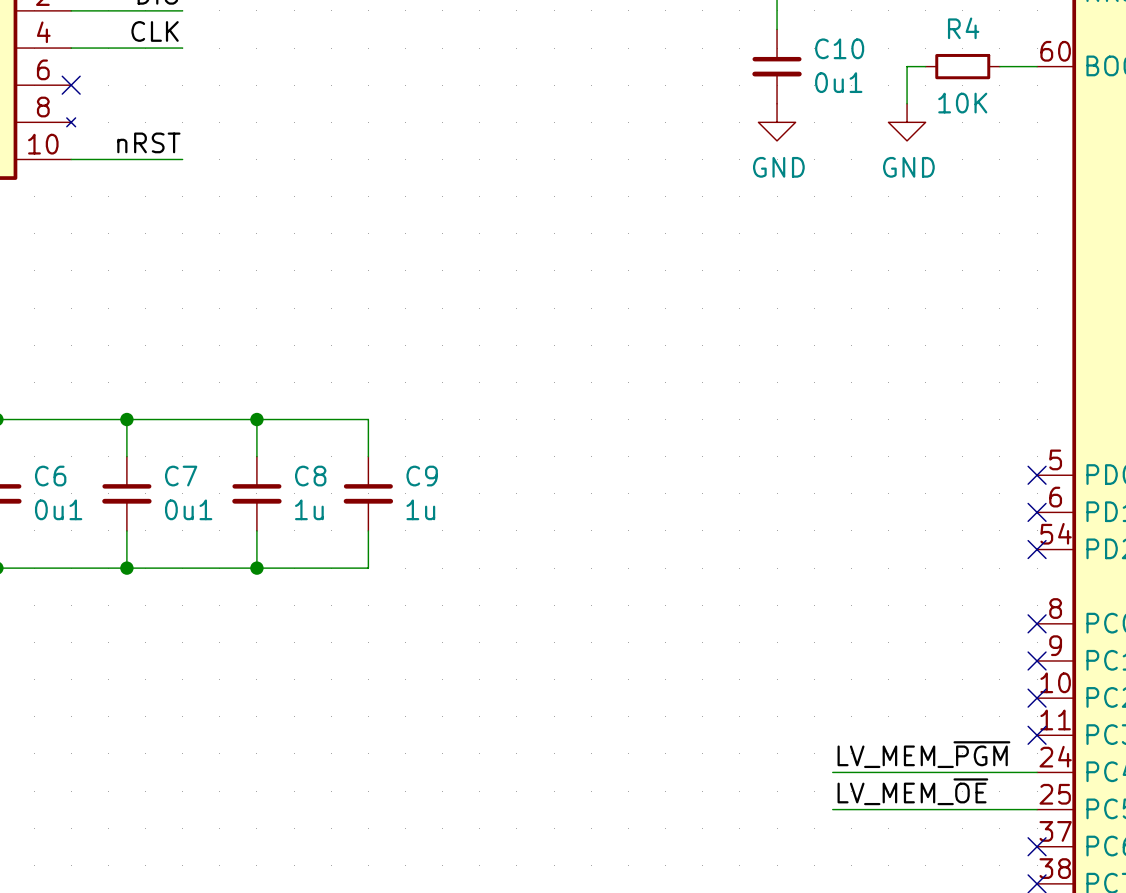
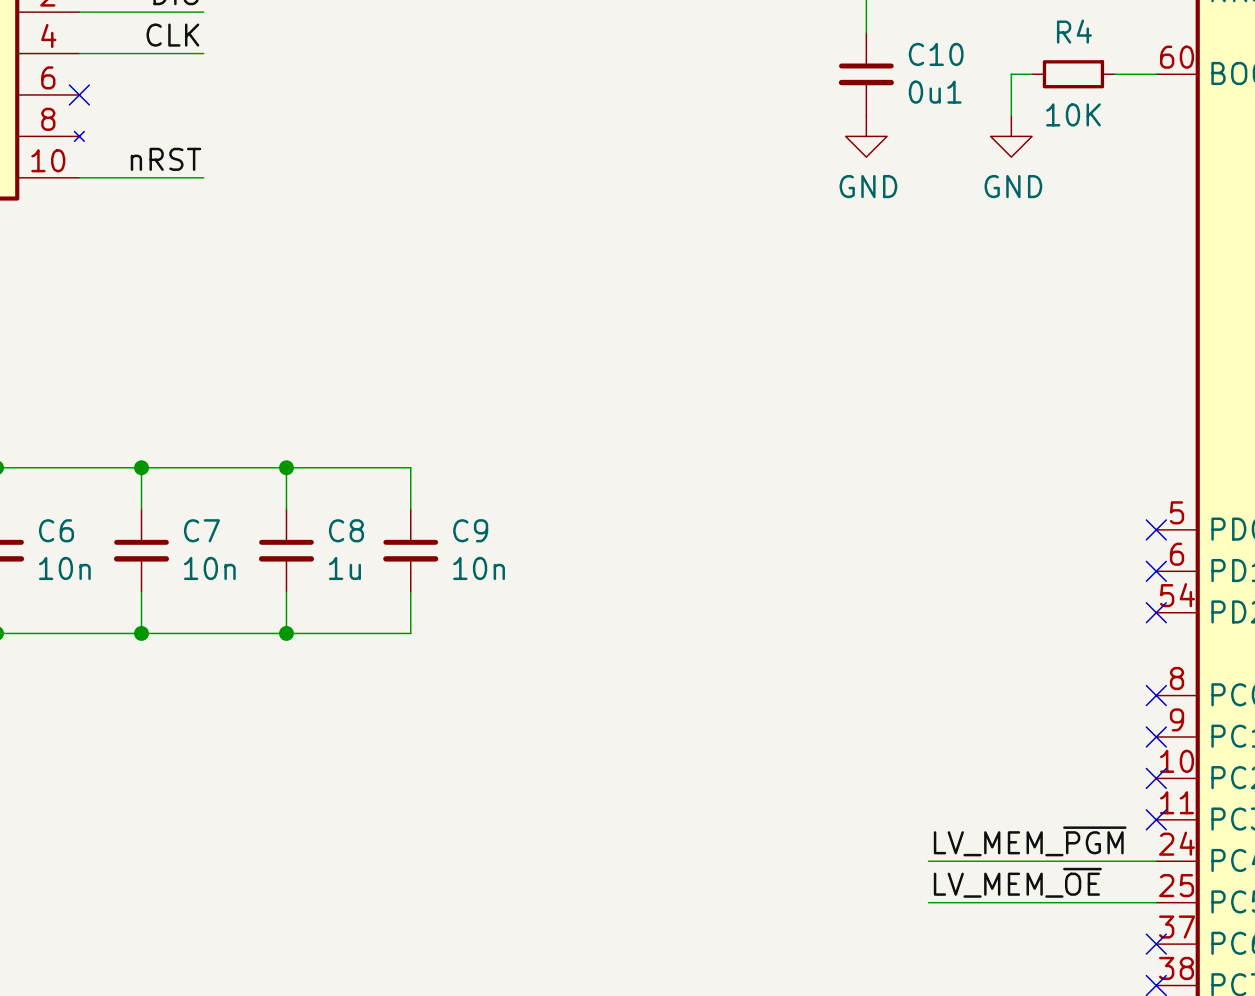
C6 value: 0u1 (58, 509) -> 10n (64, 568)
C7 value: 0u1 (188, 509) -> 10n (209, 568)
C9 value: 1u (420, 509) -> 10n (479, 568)

